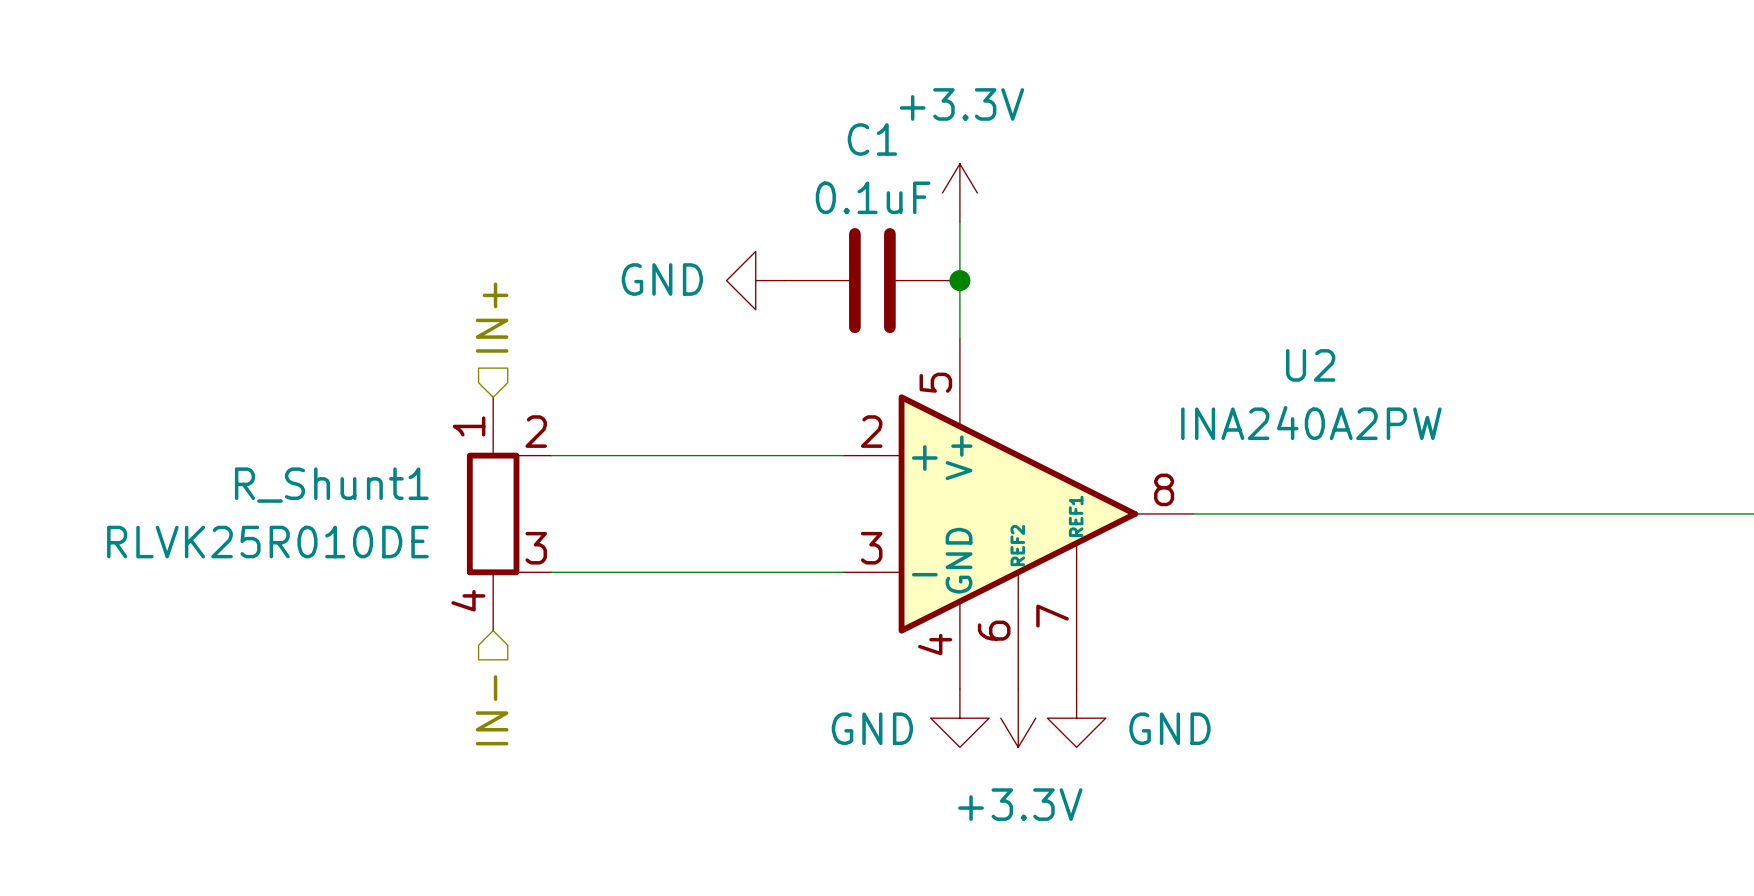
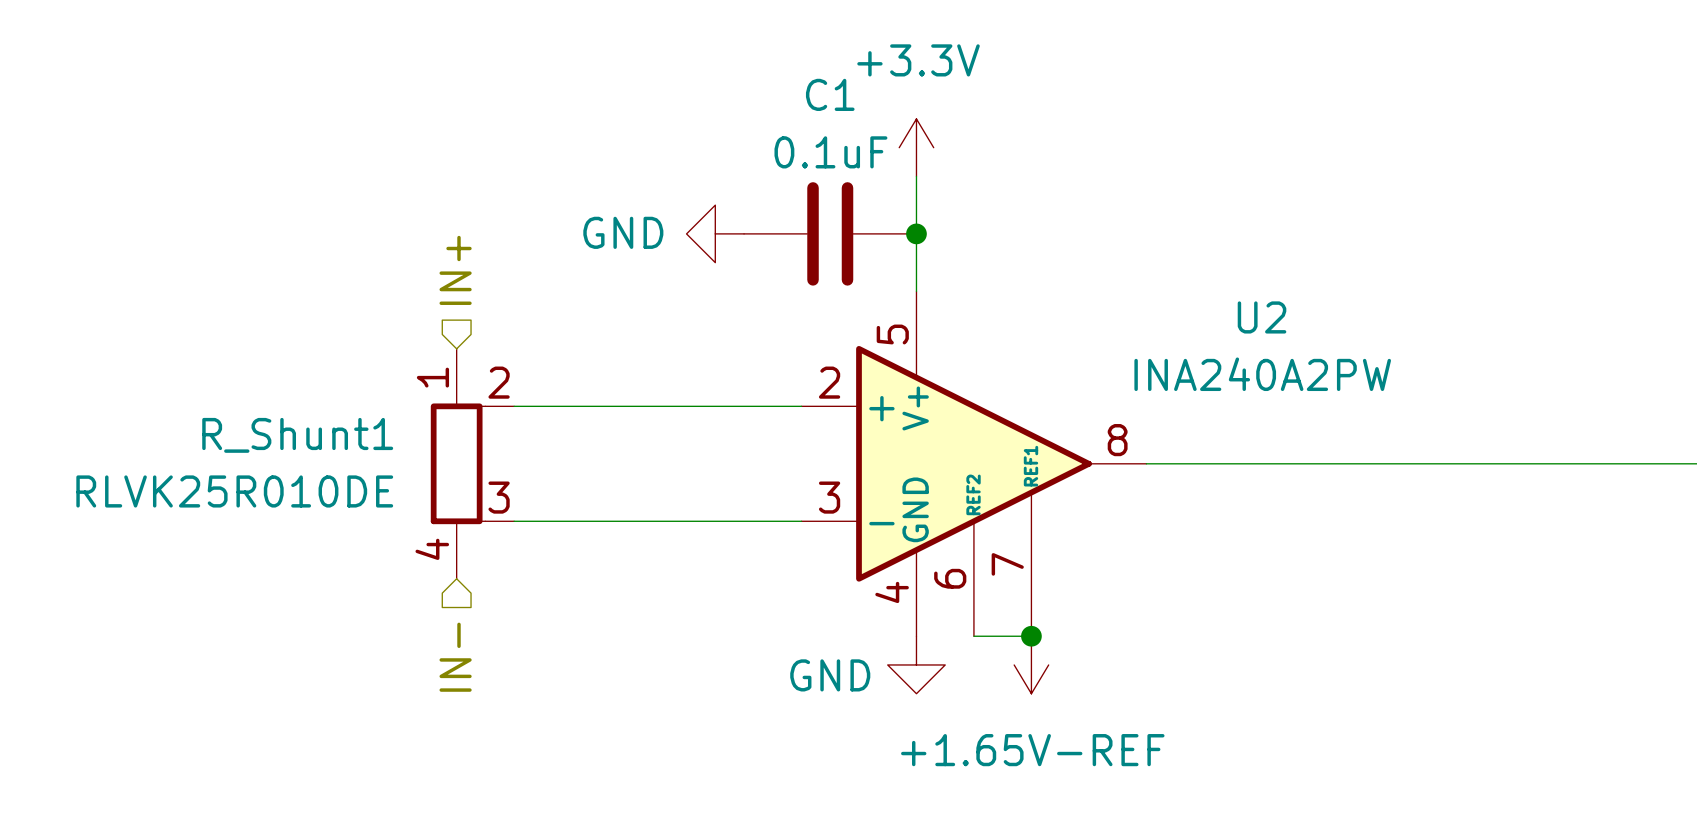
wire: none -> (973, 636) (1031, 636)
junction: none -> (1031, 636)
power symbol: +3.3V (1018, 718) -> none
power symbol: GND (1076, 718) -> +1.65V-REF (1031, 664)

